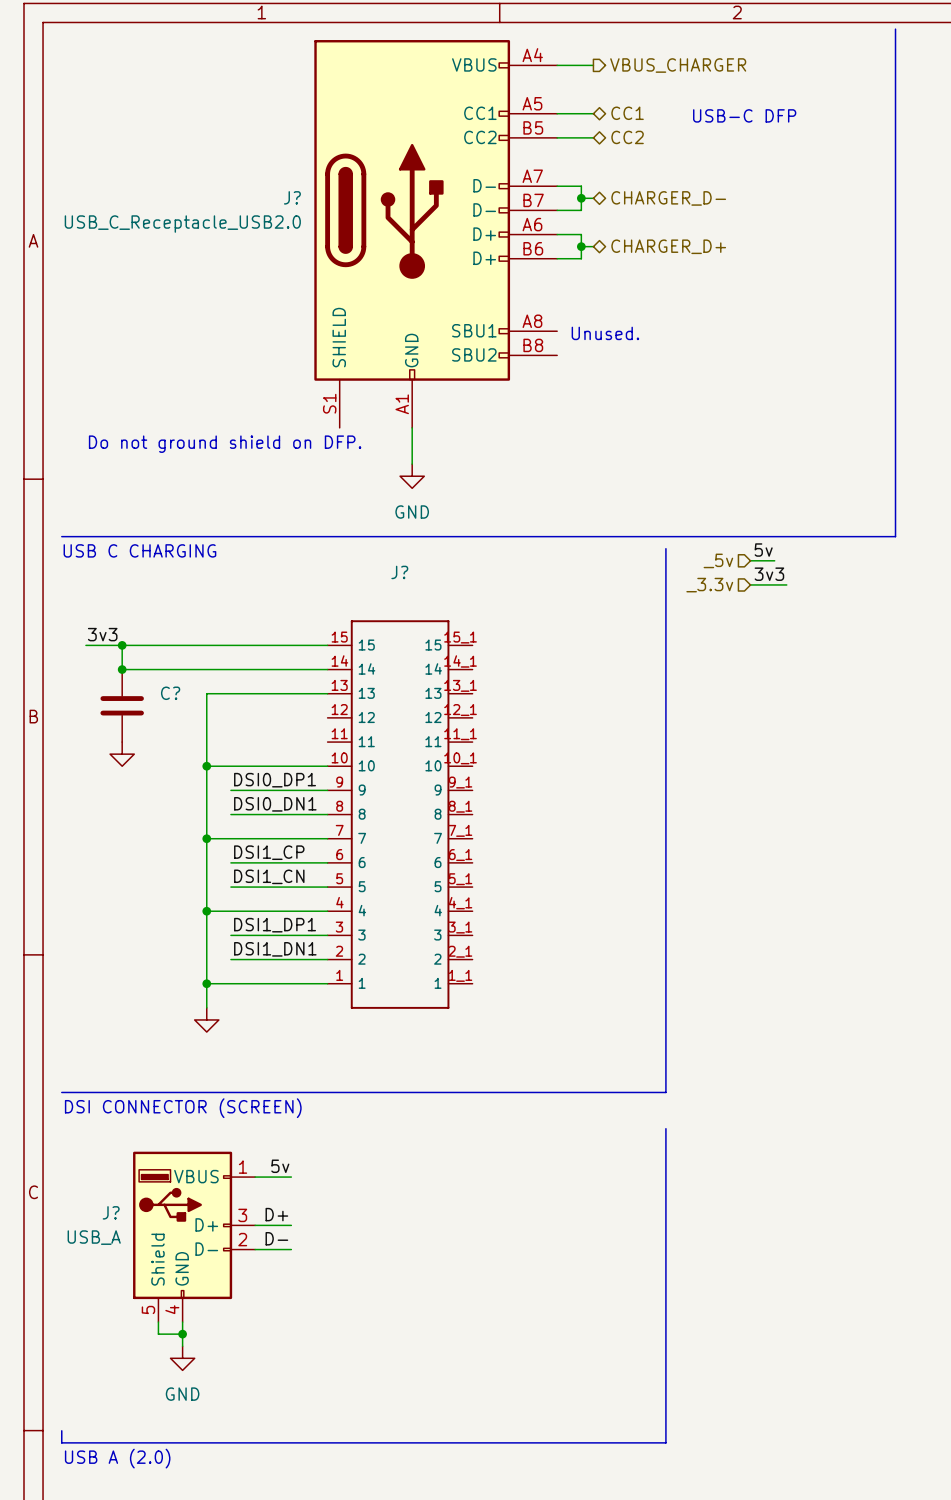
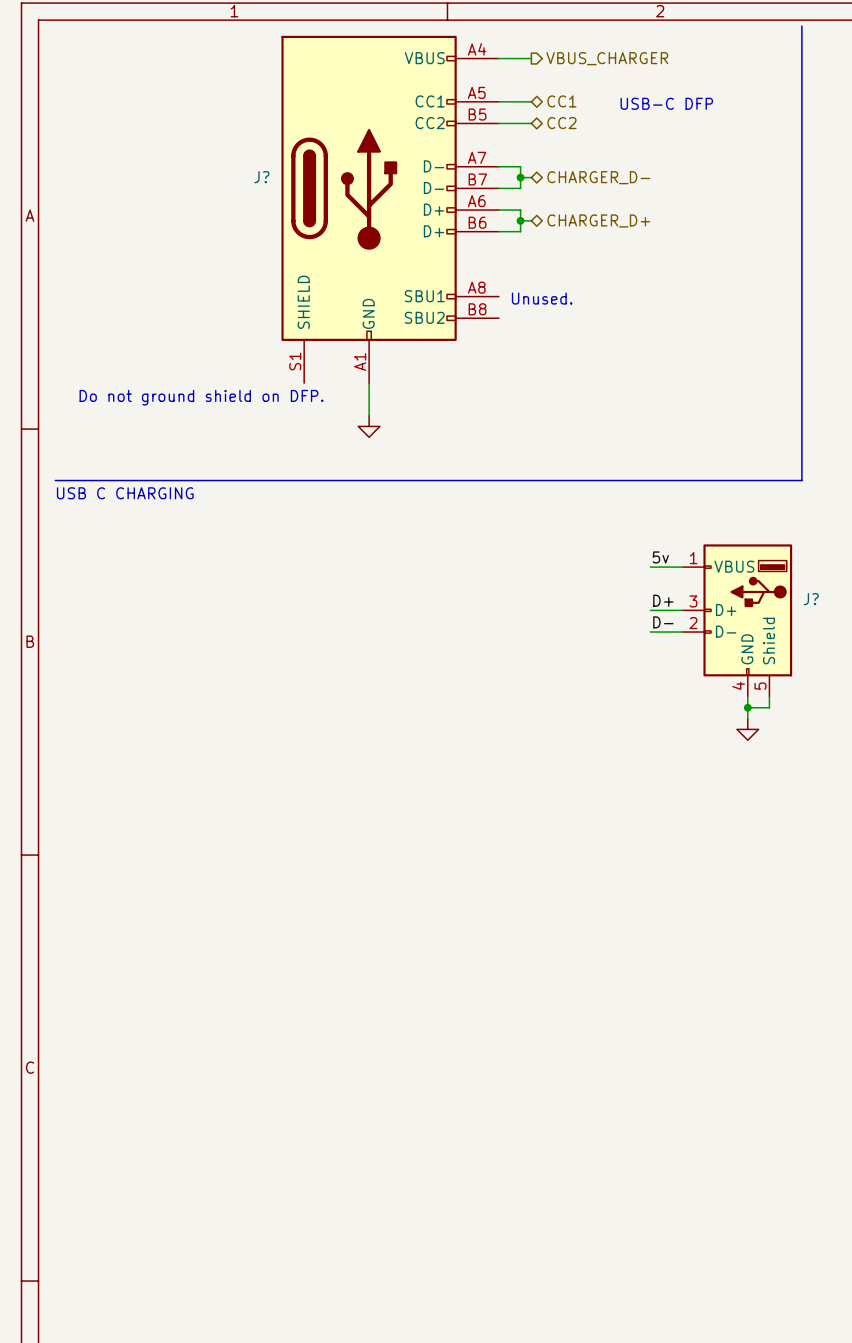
J? value: USB_C_Receptacle_USB2.0 (182, 224) -> none
power symbol text: GND (412, 512) -> none
line: (665, 548) (665, 1092) (61, 1092) -> none
label position: 5v (763, 550) -> 5v (660, 557)
hierarchical label: _5v (718, 560) -> none
wire: (750, 560) (774, 560) -> none
label: 3v3 (769, 574) -> none
wire: (750, 584) (786, 584) -> (650, 567) (682, 567)
hierarchical label: _3.3v (709, 585) -> none
label: 3v3 (102, 634) -> none
wire: (85, 645) (327, 645) -> none
wire: (122, 645) (122, 669) (327, 669) -> none
junction: (122, 645) -> none
junction: (122, 669) -> none
label: none -> D+ (663, 600)
wire: none -> (650, 610) (682, 610)
wire: (327, 693) (206, 693) (206, 1007) -> none
J?: none -> (737, 620)
label: none -> D- (663, 622)
C?: (122, 705) -> none
wire: none -> (650, 632) (682, 632)
power symbol: (122, 754) -> none
wire: (206, 766) (327, 766) -> none
junction: (206, 766) -> none
wire: none -> (747, 696) (747, 718)
wire: none -> (769, 696) (769, 707) (747, 707)
label: DSI0_DP1 (275, 780) -> none
wire: (230, 790) (327, 790) -> none
junction: none -> (747, 707)
label: DSI0_DN1 (275, 804) -> none
wire: (230, 814) (327, 814) -> none
J?: (400, 814) -> none
power symbol: none -> (747, 729)
wire: (206, 838) (327, 838) -> none
junction: (206, 838) -> none
label: DSI1_CP (269, 852) -> none
wire: (230, 862) (327, 862) -> none
label: DSI1_CN (269, 876) -> none
wire: (230, 887) (327, 887) -> none
wire: (206, 911) (327, 911) -> none
junction: (206, 911) -> none
label: DSI1_DP1 (275, 925) -> none
wire: (230, 935) (327, 935) -> none
label: DSI1_DN1 (275, 949) -> none
wire: (230, 959) (327, 959) -> none
wire: (206, 983) (327, 983) -> none
junction: (206, 983) -> none
power symbol: (206, 1019) -> none
text: DSI CONNECTOR (SCREEN) (183, 1108) -> none
line: (665, 1128) (665, 1442) (61, 1442) (61, 1430) -> none
label: 5v (280, 1166) -> none
wire: (255, 1177) (291, 1177) -> none
label: D+ (276, 1214) -> none
wire: (255, 1225) (291, 1225) -> none
J?: USB_A (194, 1236) -> none
label: D- (276, 1238) -> none
wire: (255, 1249) (291, 1249) -> none
wire: (158, 1322) (158, 1334) (182, 1334) -> none
wire: (182, 1322) (182, 1346) -> none
junction: (182, 1334) -> none
power symbol: GND (182, 1358) -> none
text: USB A (2.0) (117, 1458) -> none

